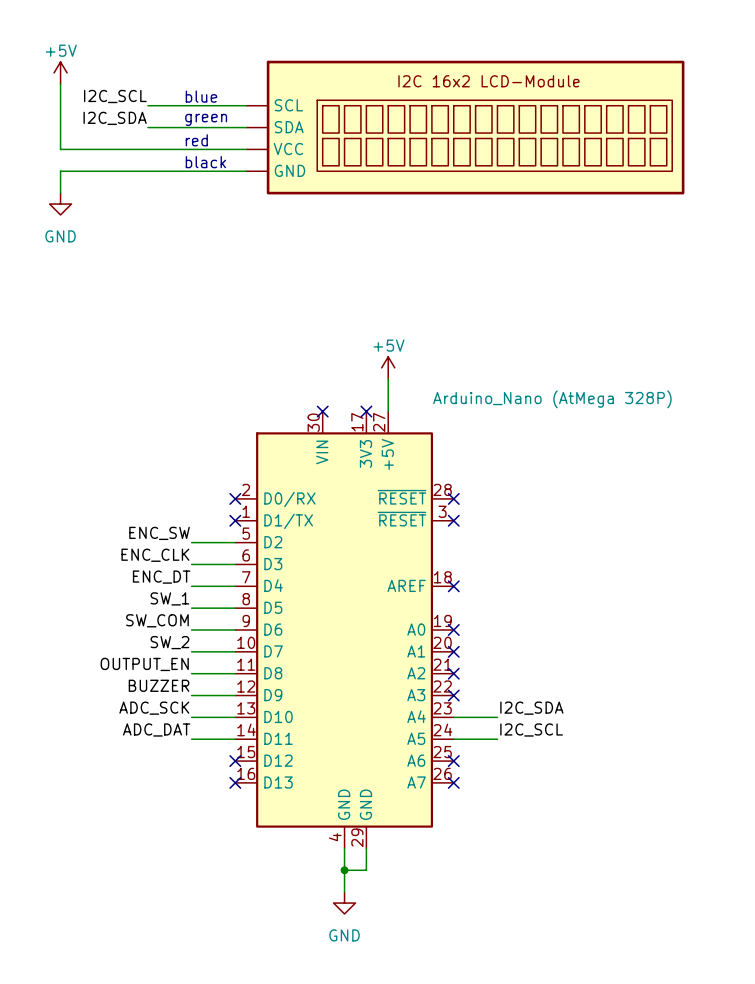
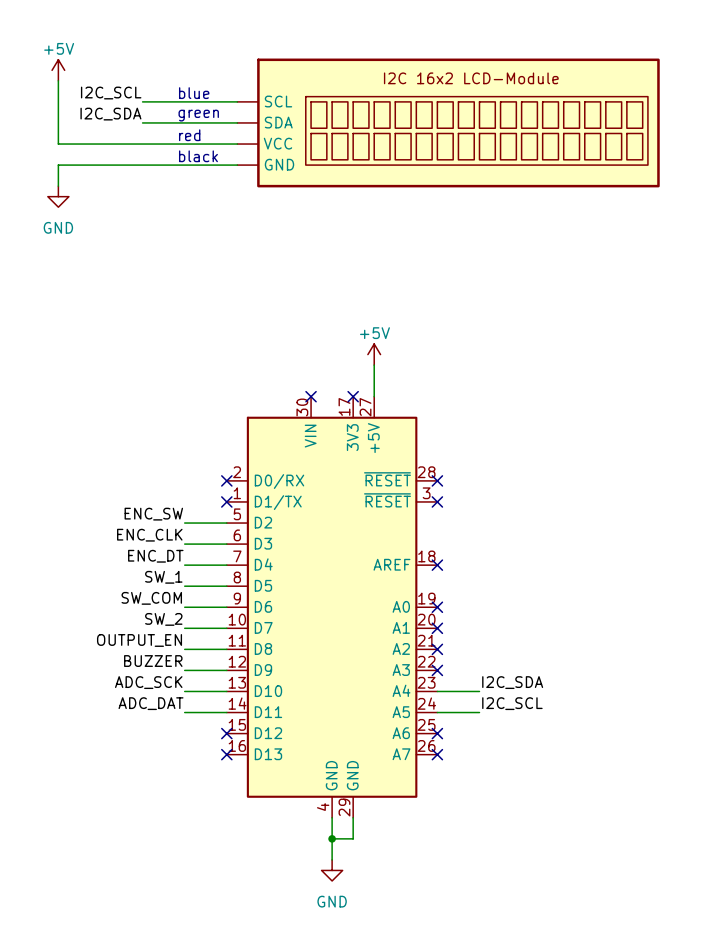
part value: Arduino_Nano (AtMega 328P) (552, 399) -> none

